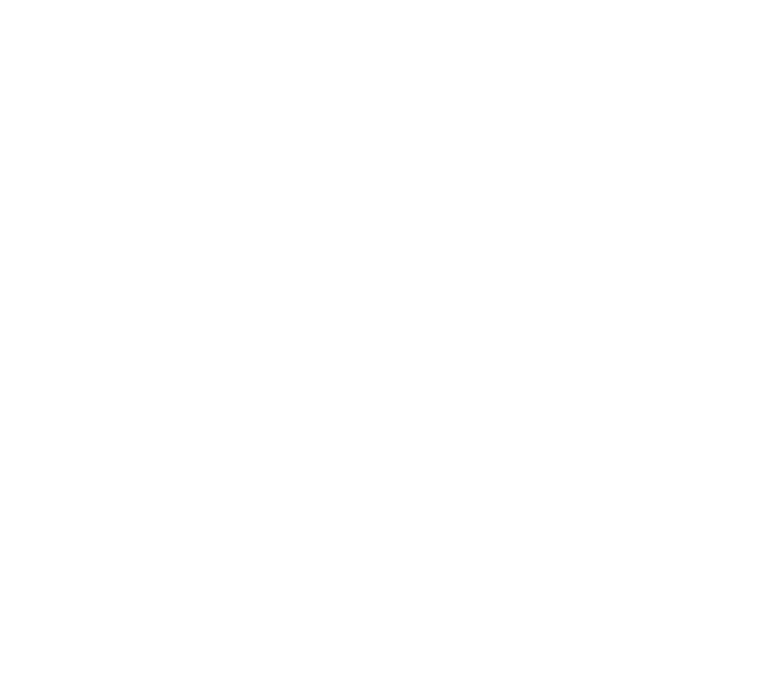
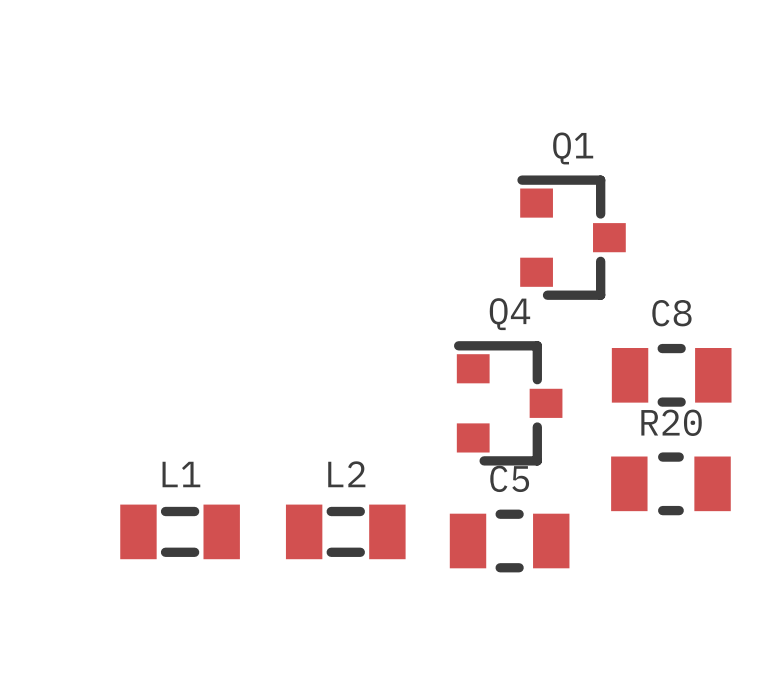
Q1: none -> (571, 237)
C8: none -> (671, 375)
Q4: none -> (508, 403)
R20: none -> (670, 483)
L1: none -> (180, 531)
L2: none -> (345, 531)
C5: none -> (509, 541)

